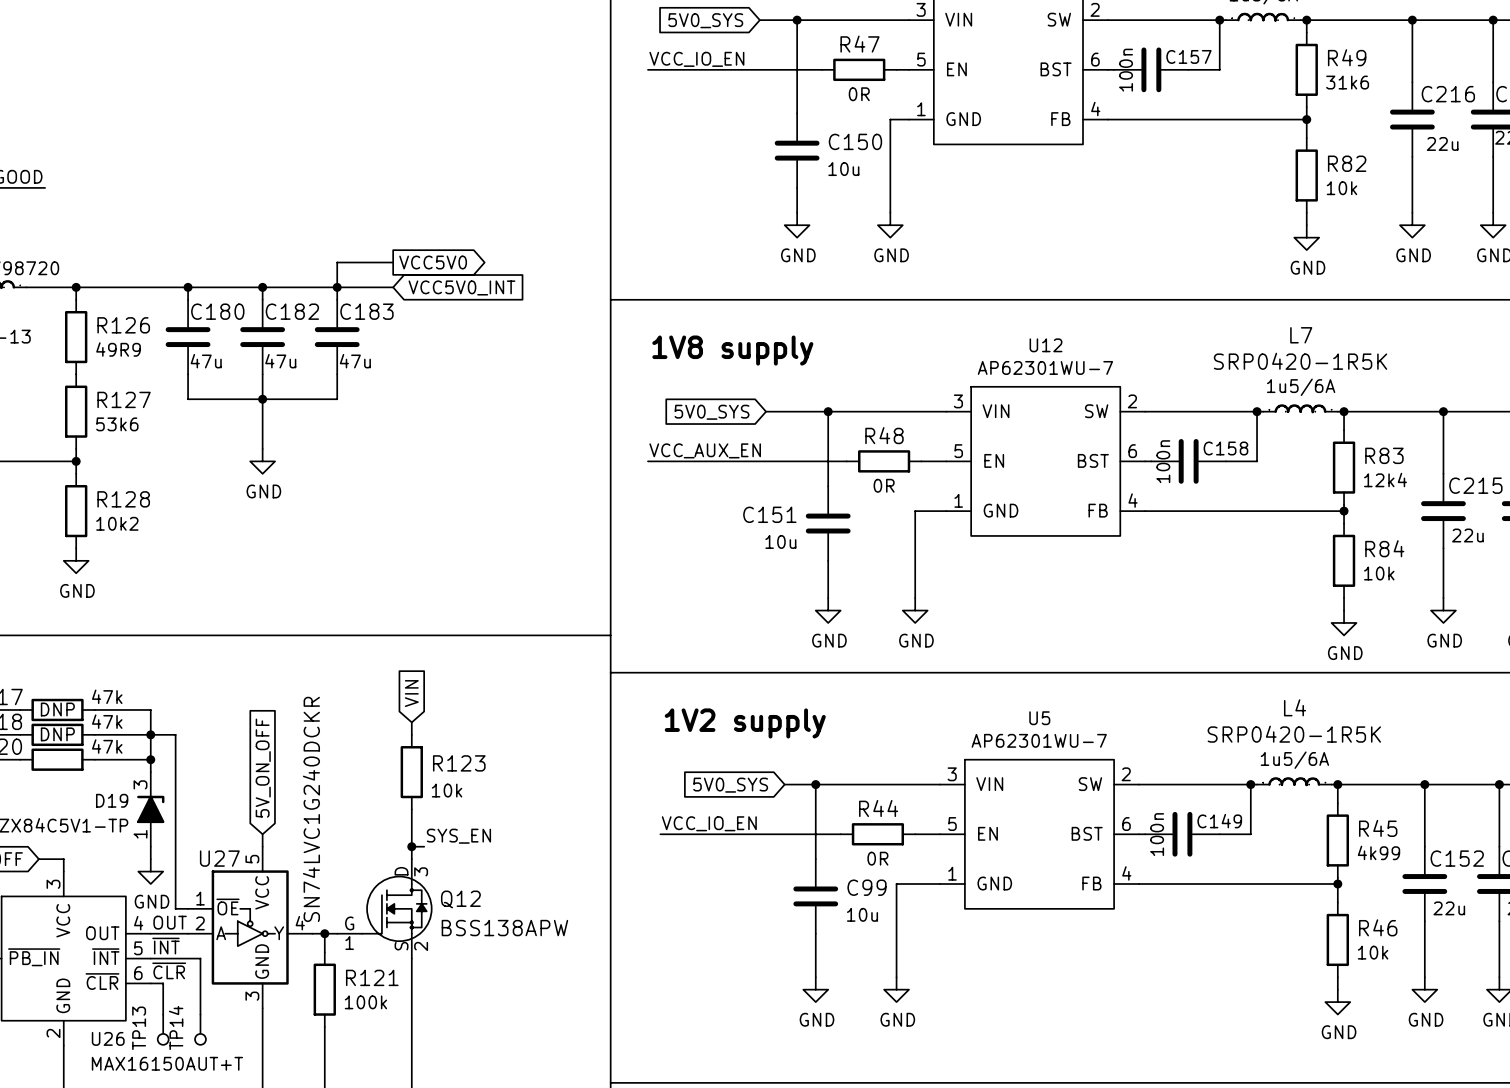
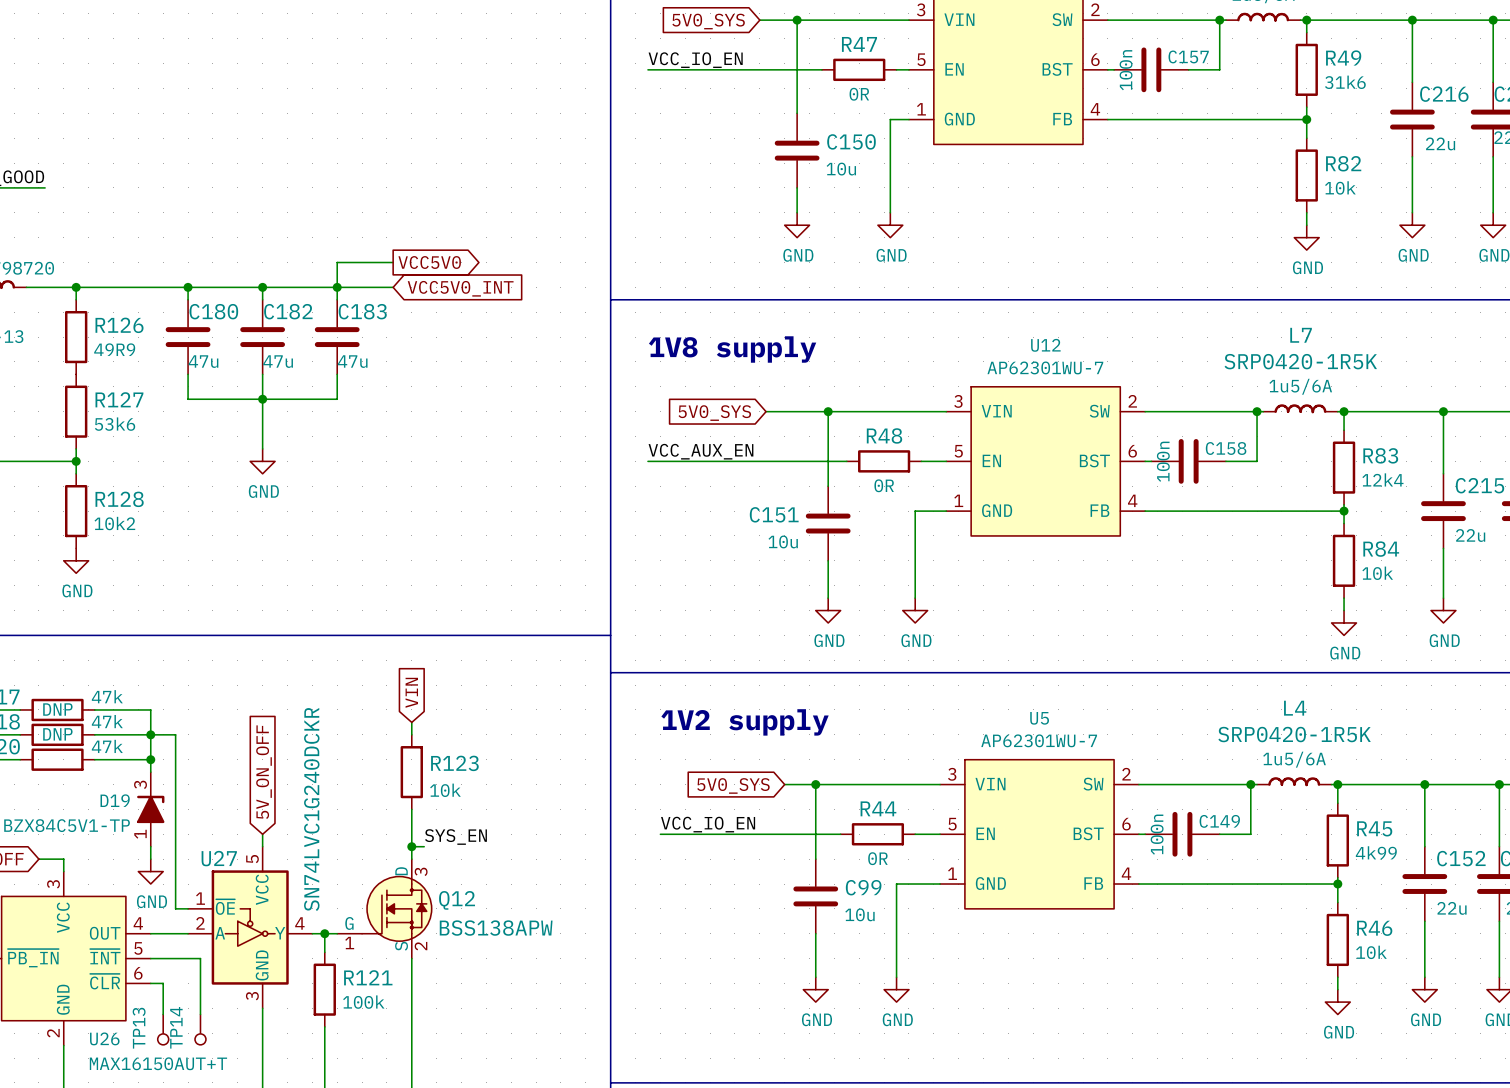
label: OUT (170, 922) -> none
label: ~{INT} (165, 946) -> none
label: ~{CLR} (169, 970) -> none

